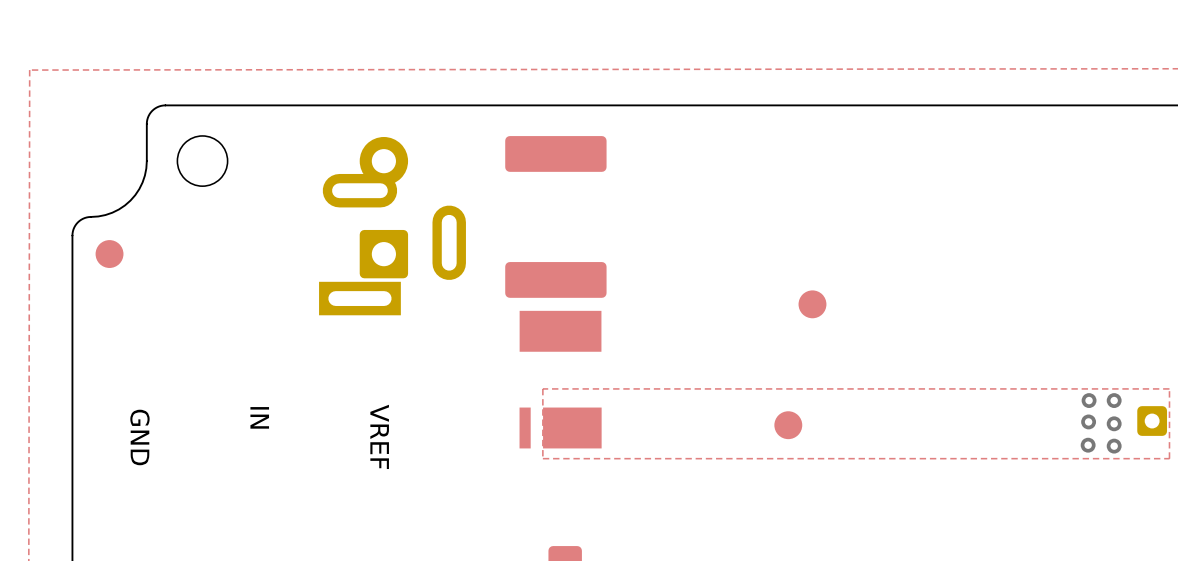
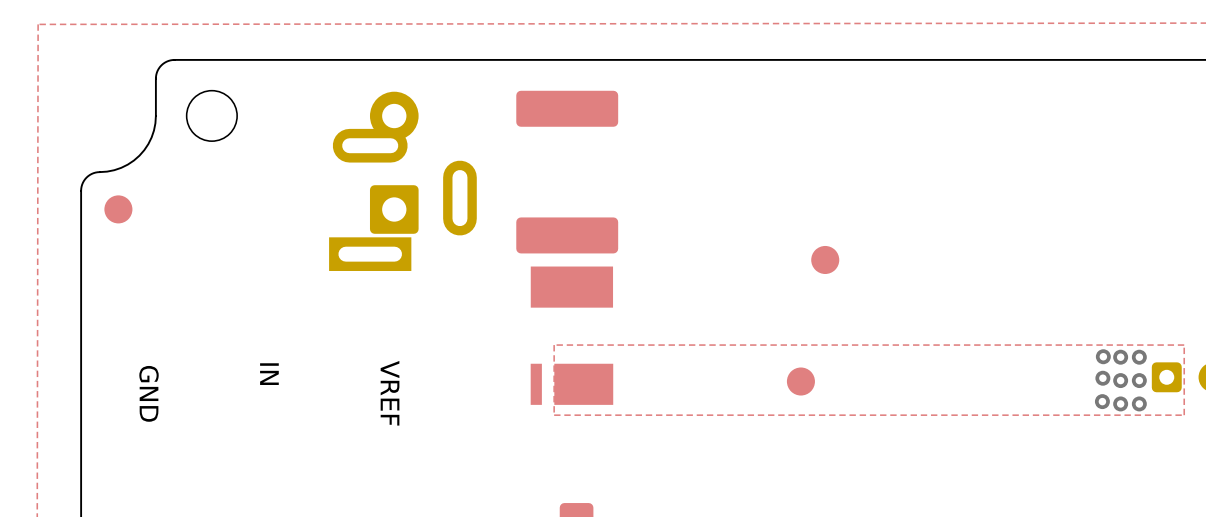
via: (1114, 400) -> none
via: none -> (1120, 357)
via: none -> (1139, 357)
via: (1114, 423) -> none
via: none -> (1120, 380)
via: none -> (1139, 380)
via: (1114, 446) -> none
via: none -> (1120, 403)
via: none -> (1139, 403)

